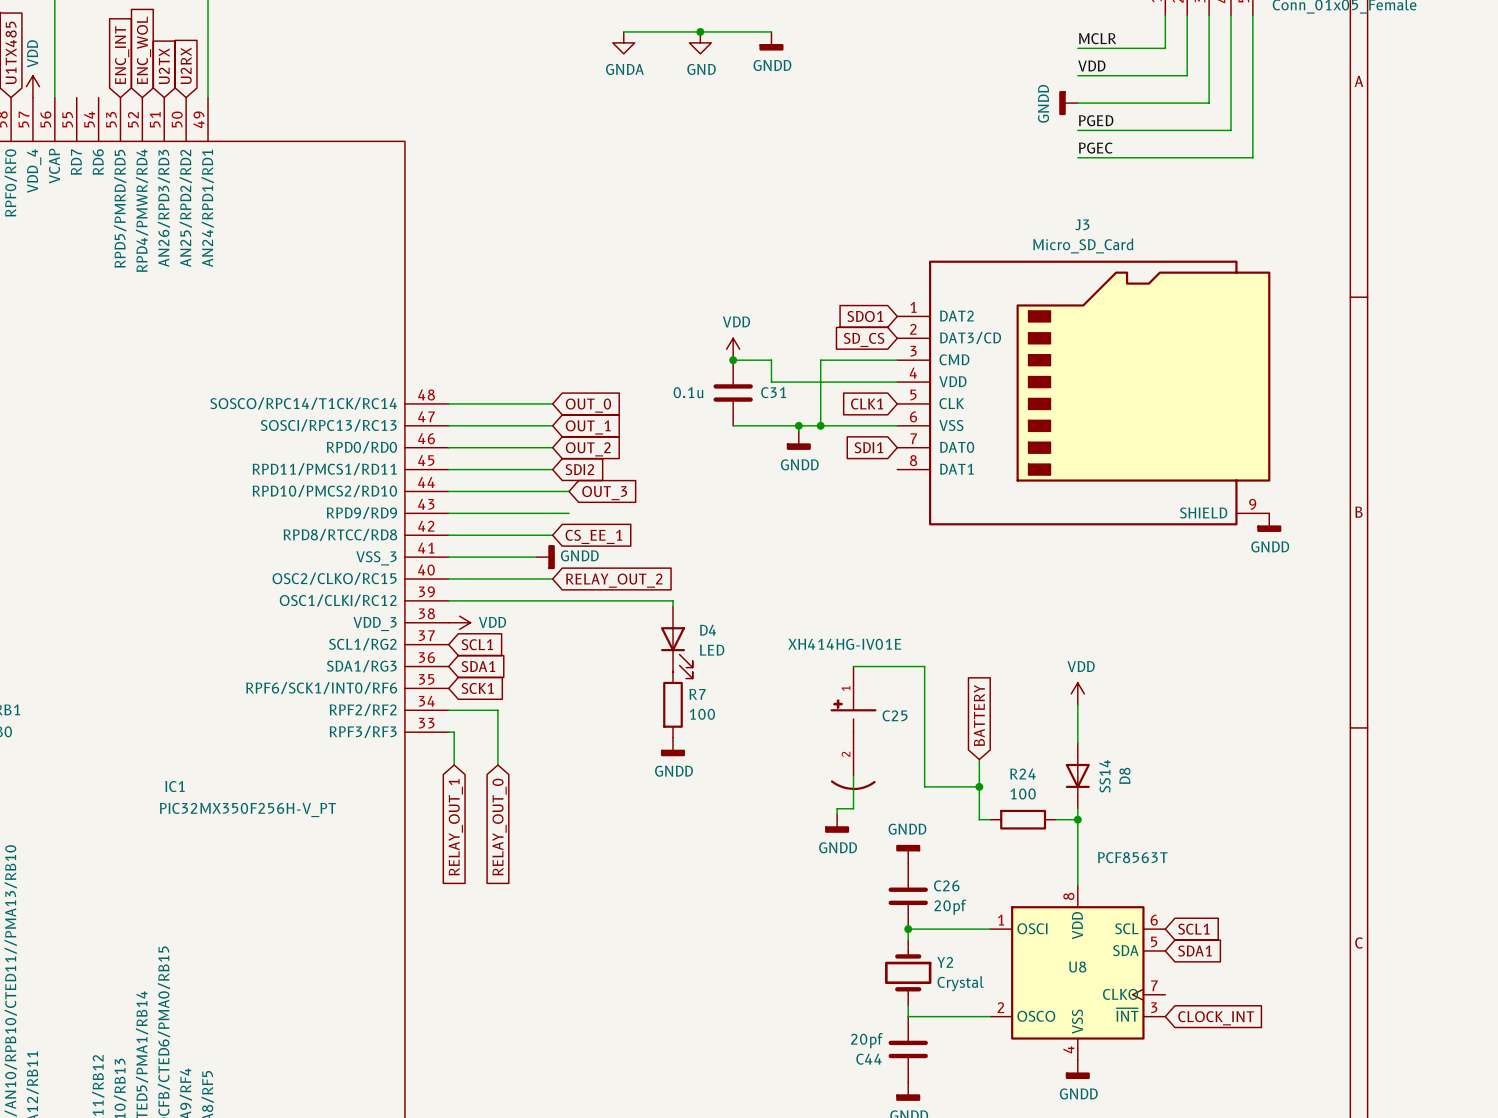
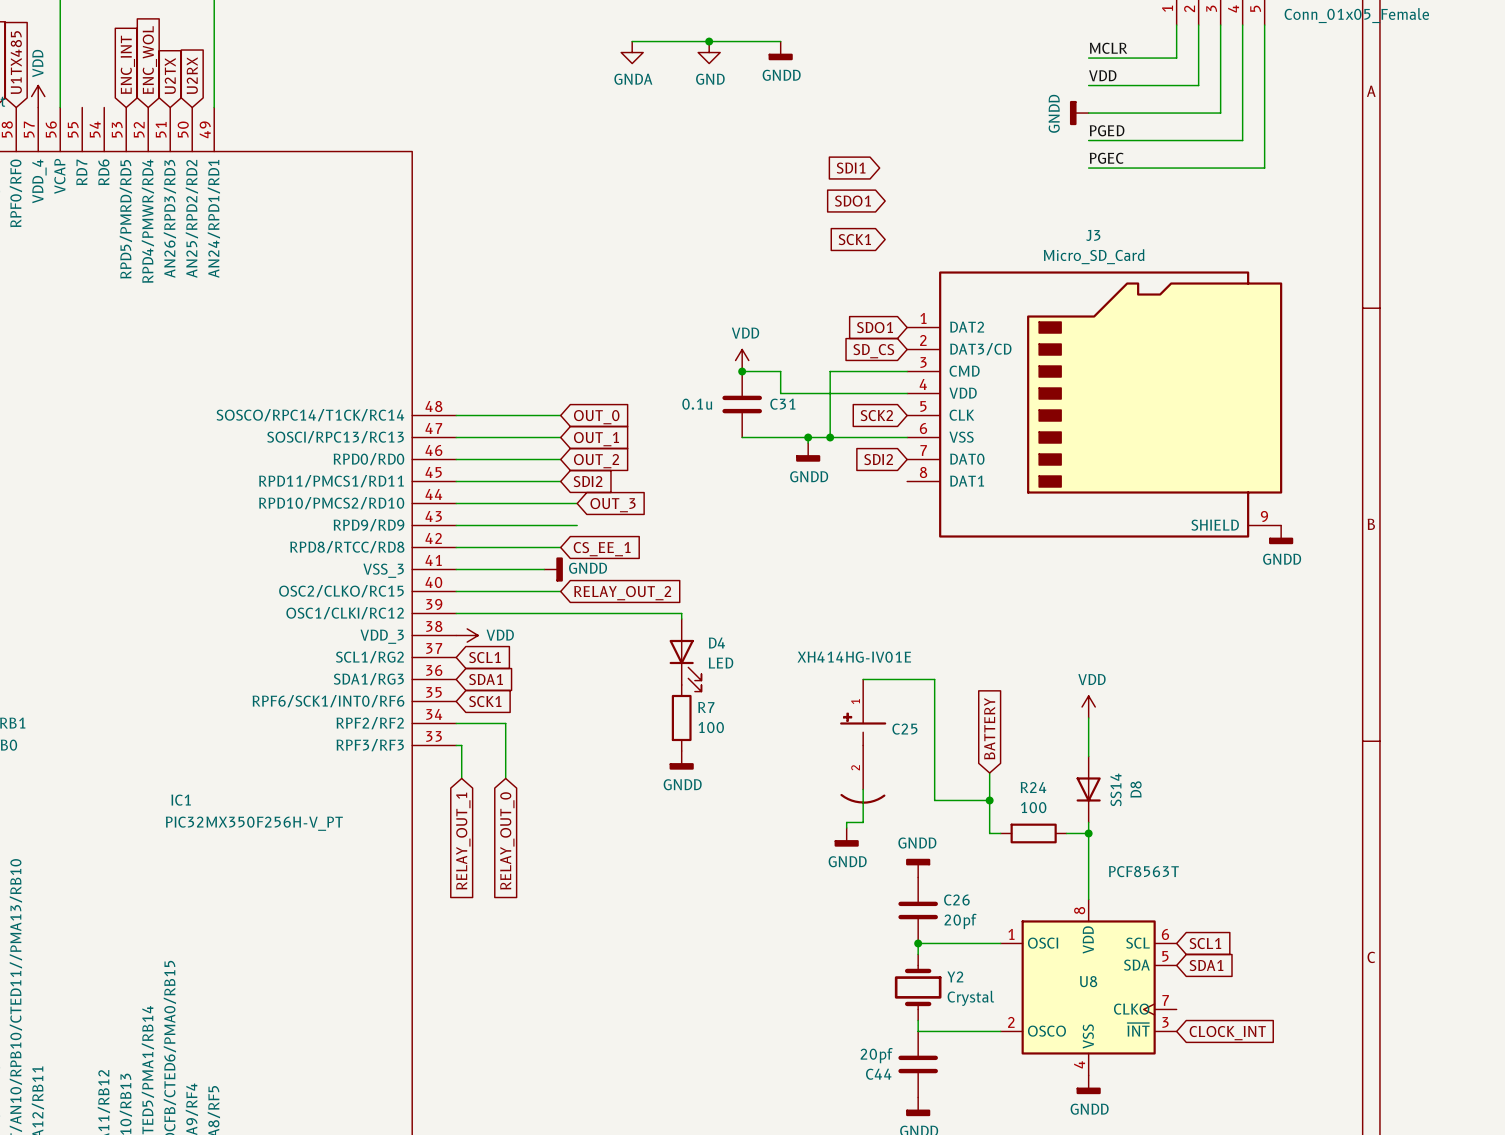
global label: none -> SDI1 (851, 168)
global label: none -> SDO1 (853, 201)
global label: none -> SCK1 (854, 239)
global label: CLK1 (867, 404) -> SCK2 (876, 415)
global label: SDI1 (868, 447) -> SDI2 (878, 459)

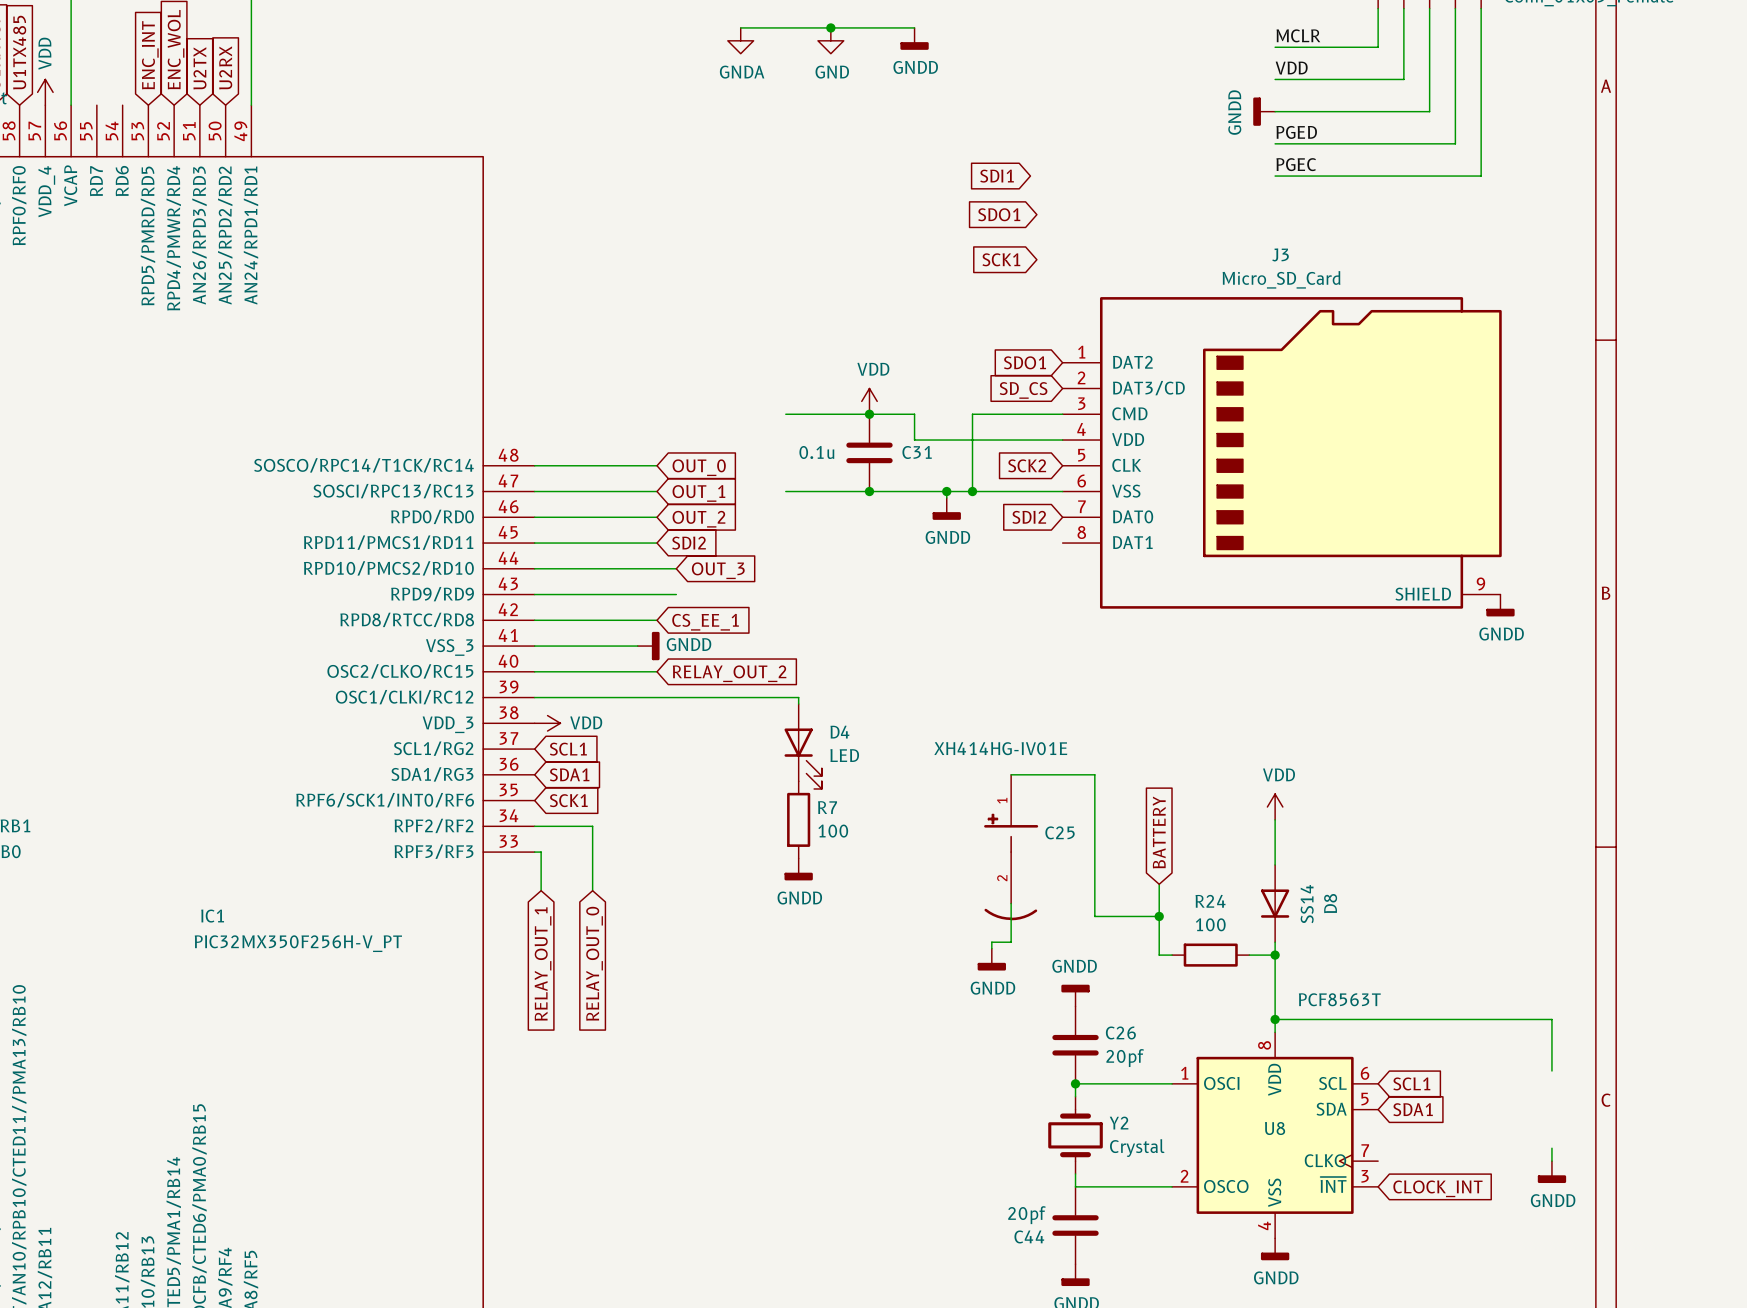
wire: none -> (785, 414) (869, 414)
wire: none -> (785, 491) (869, 491)
junction: none -> (869, 491)
wire: none -> (1275, 1019) (1551, 1019) (1551, 1070)
junction: none -> (1275, 1019)
wire: none -> (1551, 1148) (1551, 1161)
power symbol: none -> GNDD (1551, 1172)

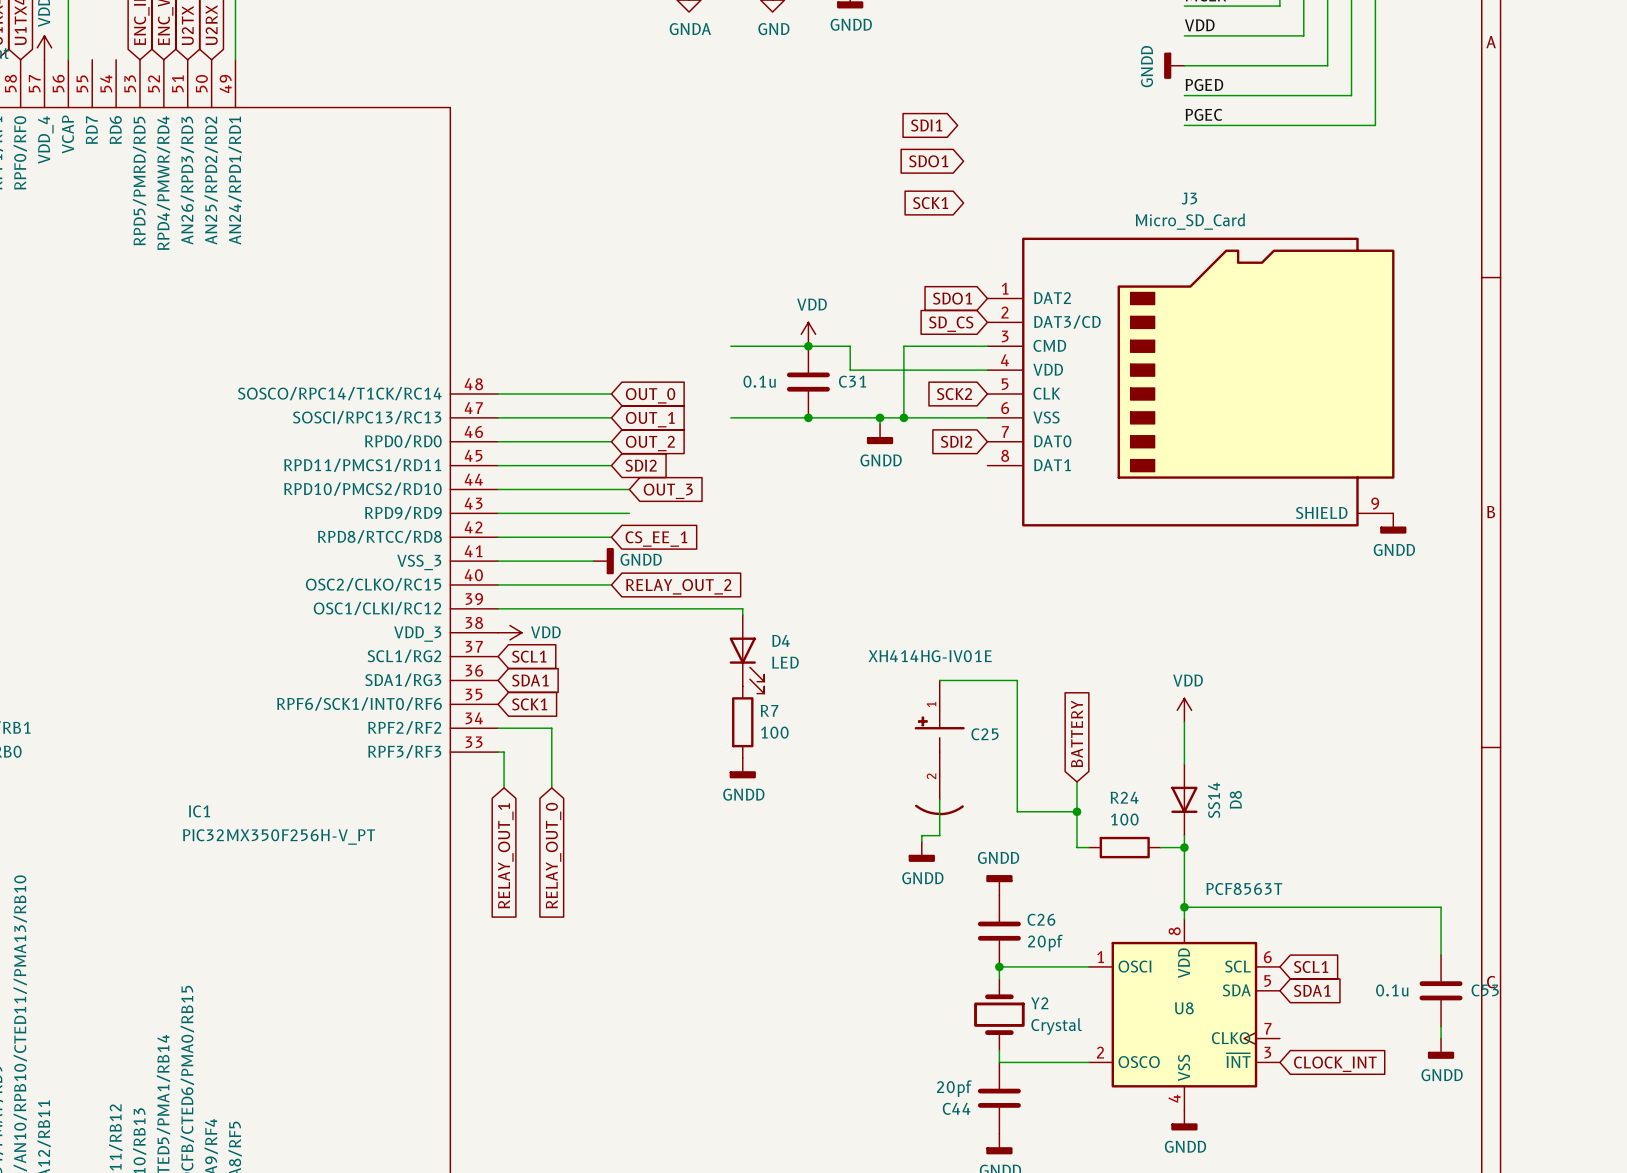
C53: none -> 0.1u (1441, 990)

